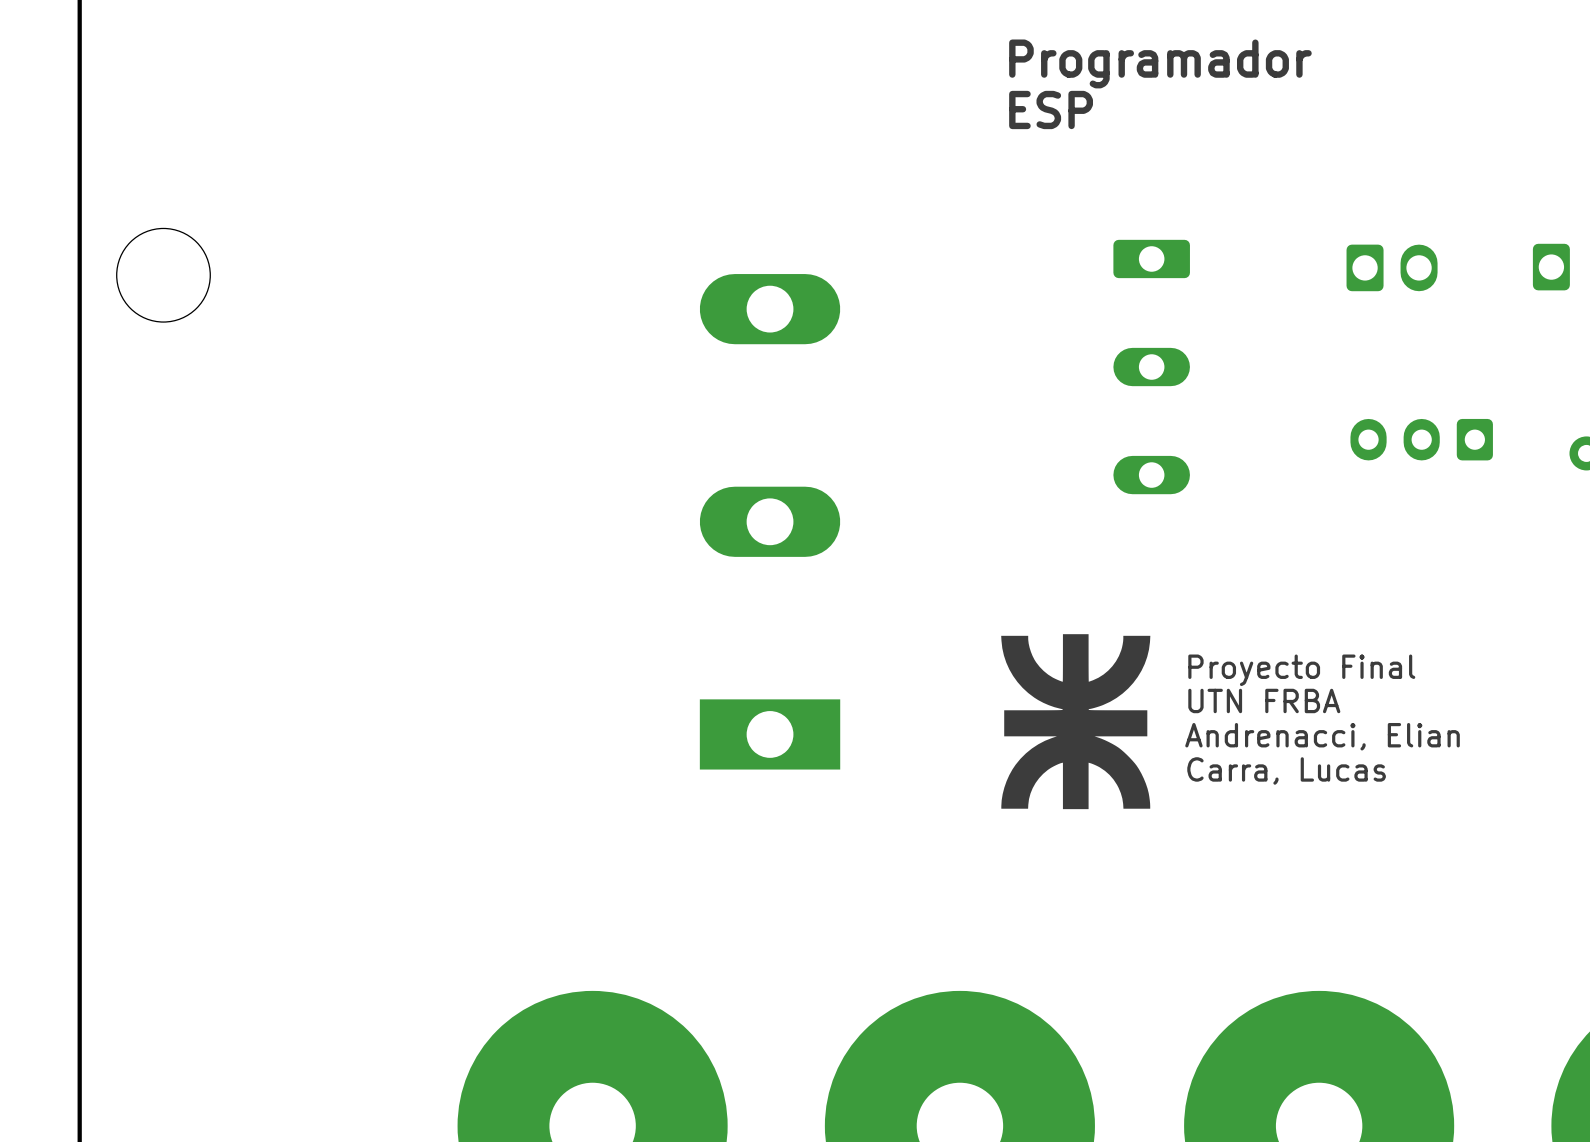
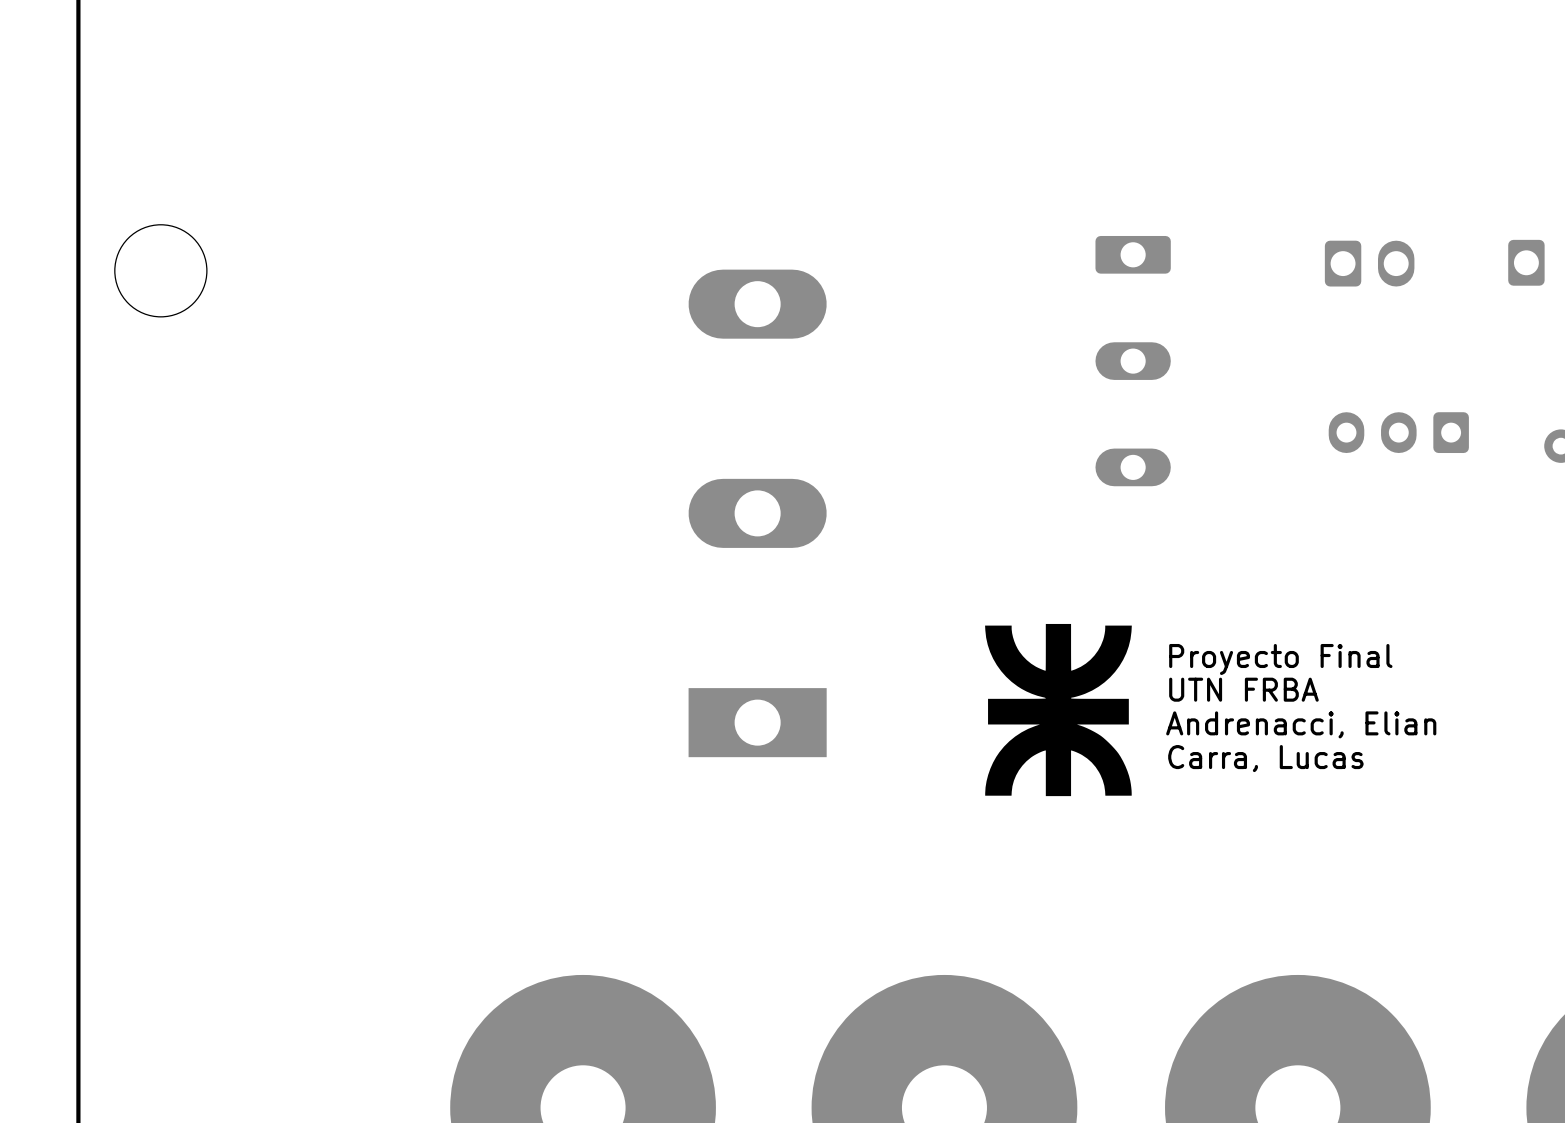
text: Programador (1160, 63) -> none
text: ESP (1051, 109) -> none

